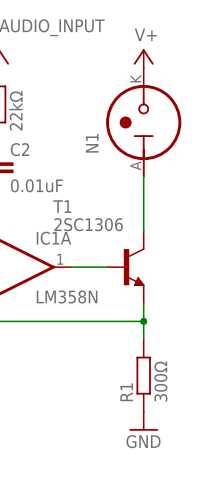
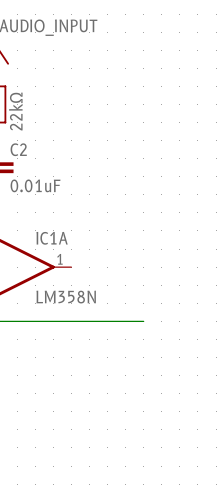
power symbol: V+ (143, 58) -> none
N1: (143, 122) -> none
wire: (143, 176) (143, 230) -> none
wire: (71, 267) (107, 267) -> none
T1: 2SC1306 (125, 267) -> none
wire: (143, 303) (143, 339) -> none
junction: (143, 321) -> none
R1: 300Ω (143, 375) -> none
power symbol: GND (143, 421) -> none

